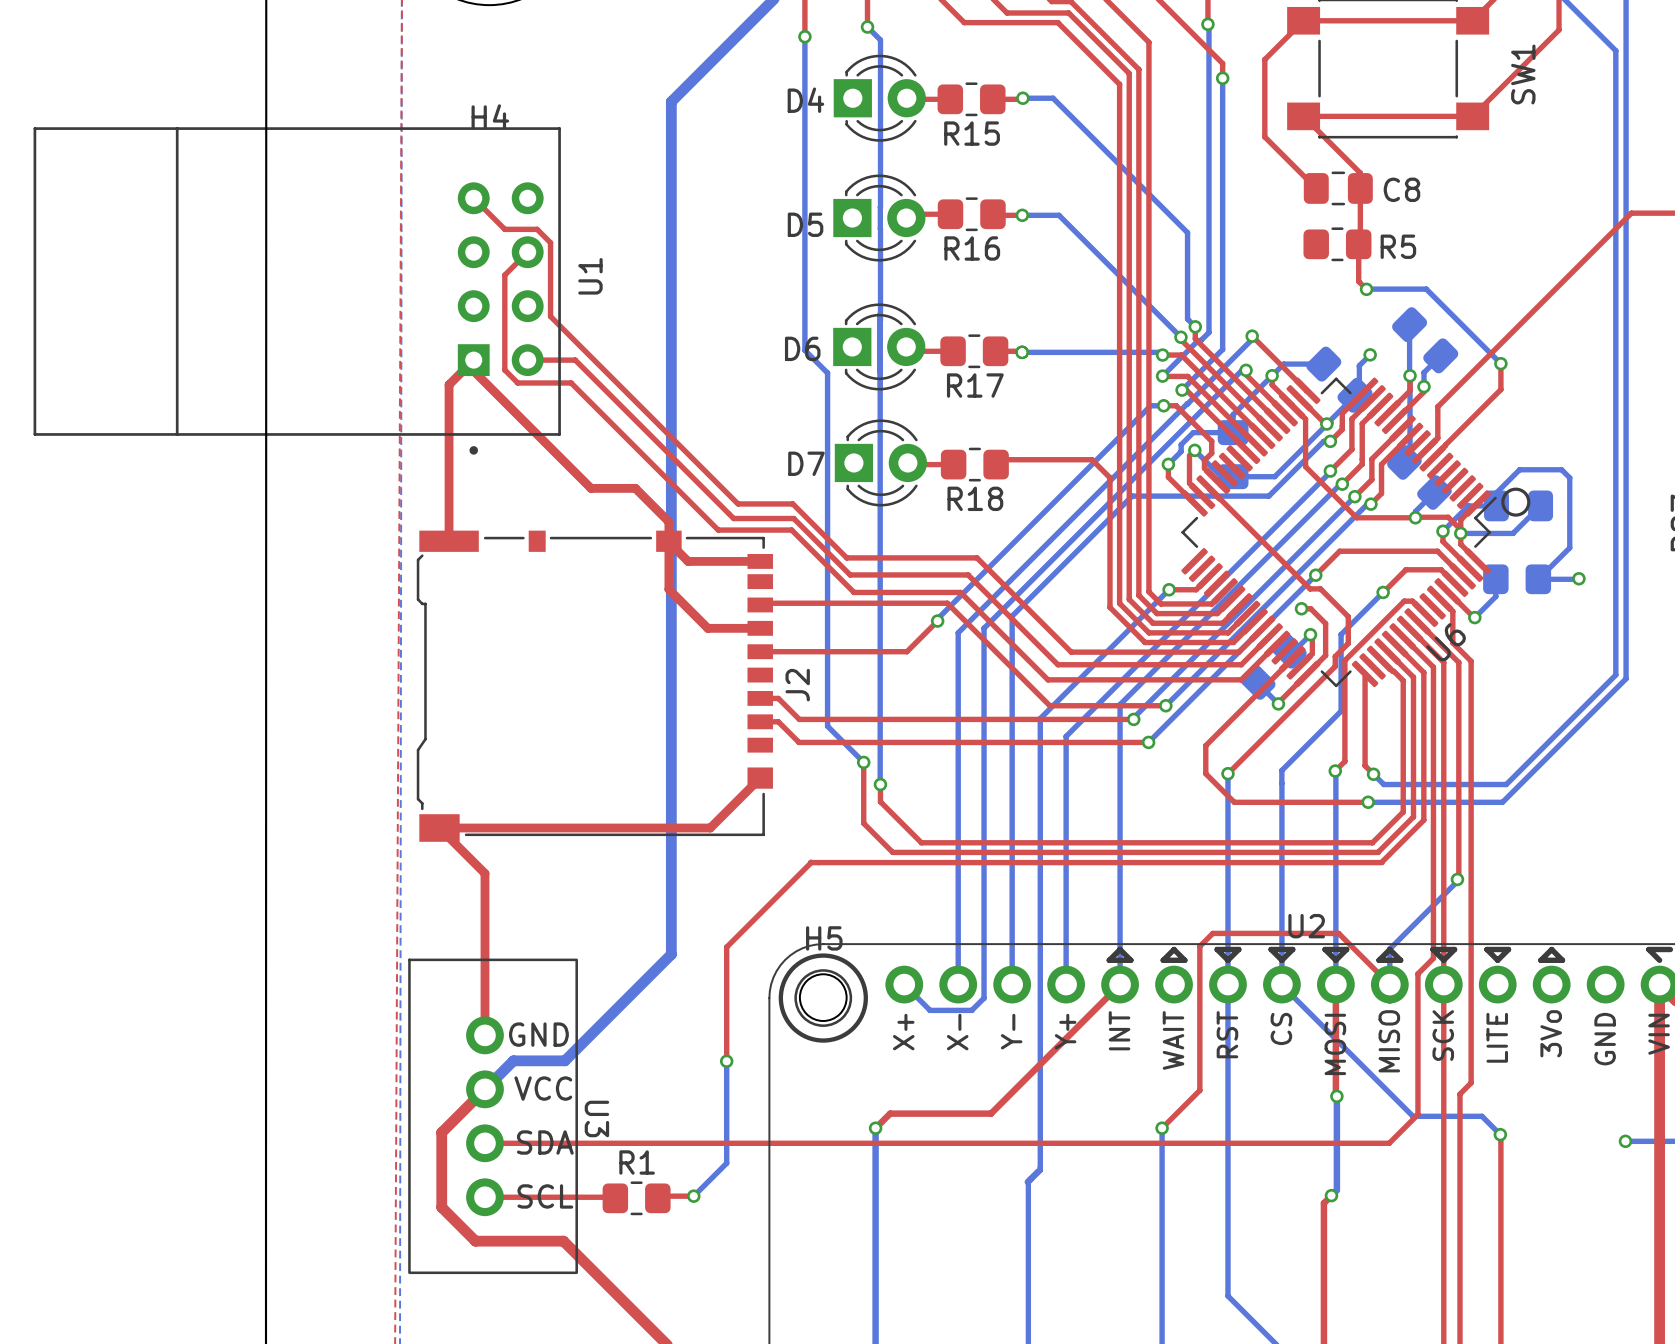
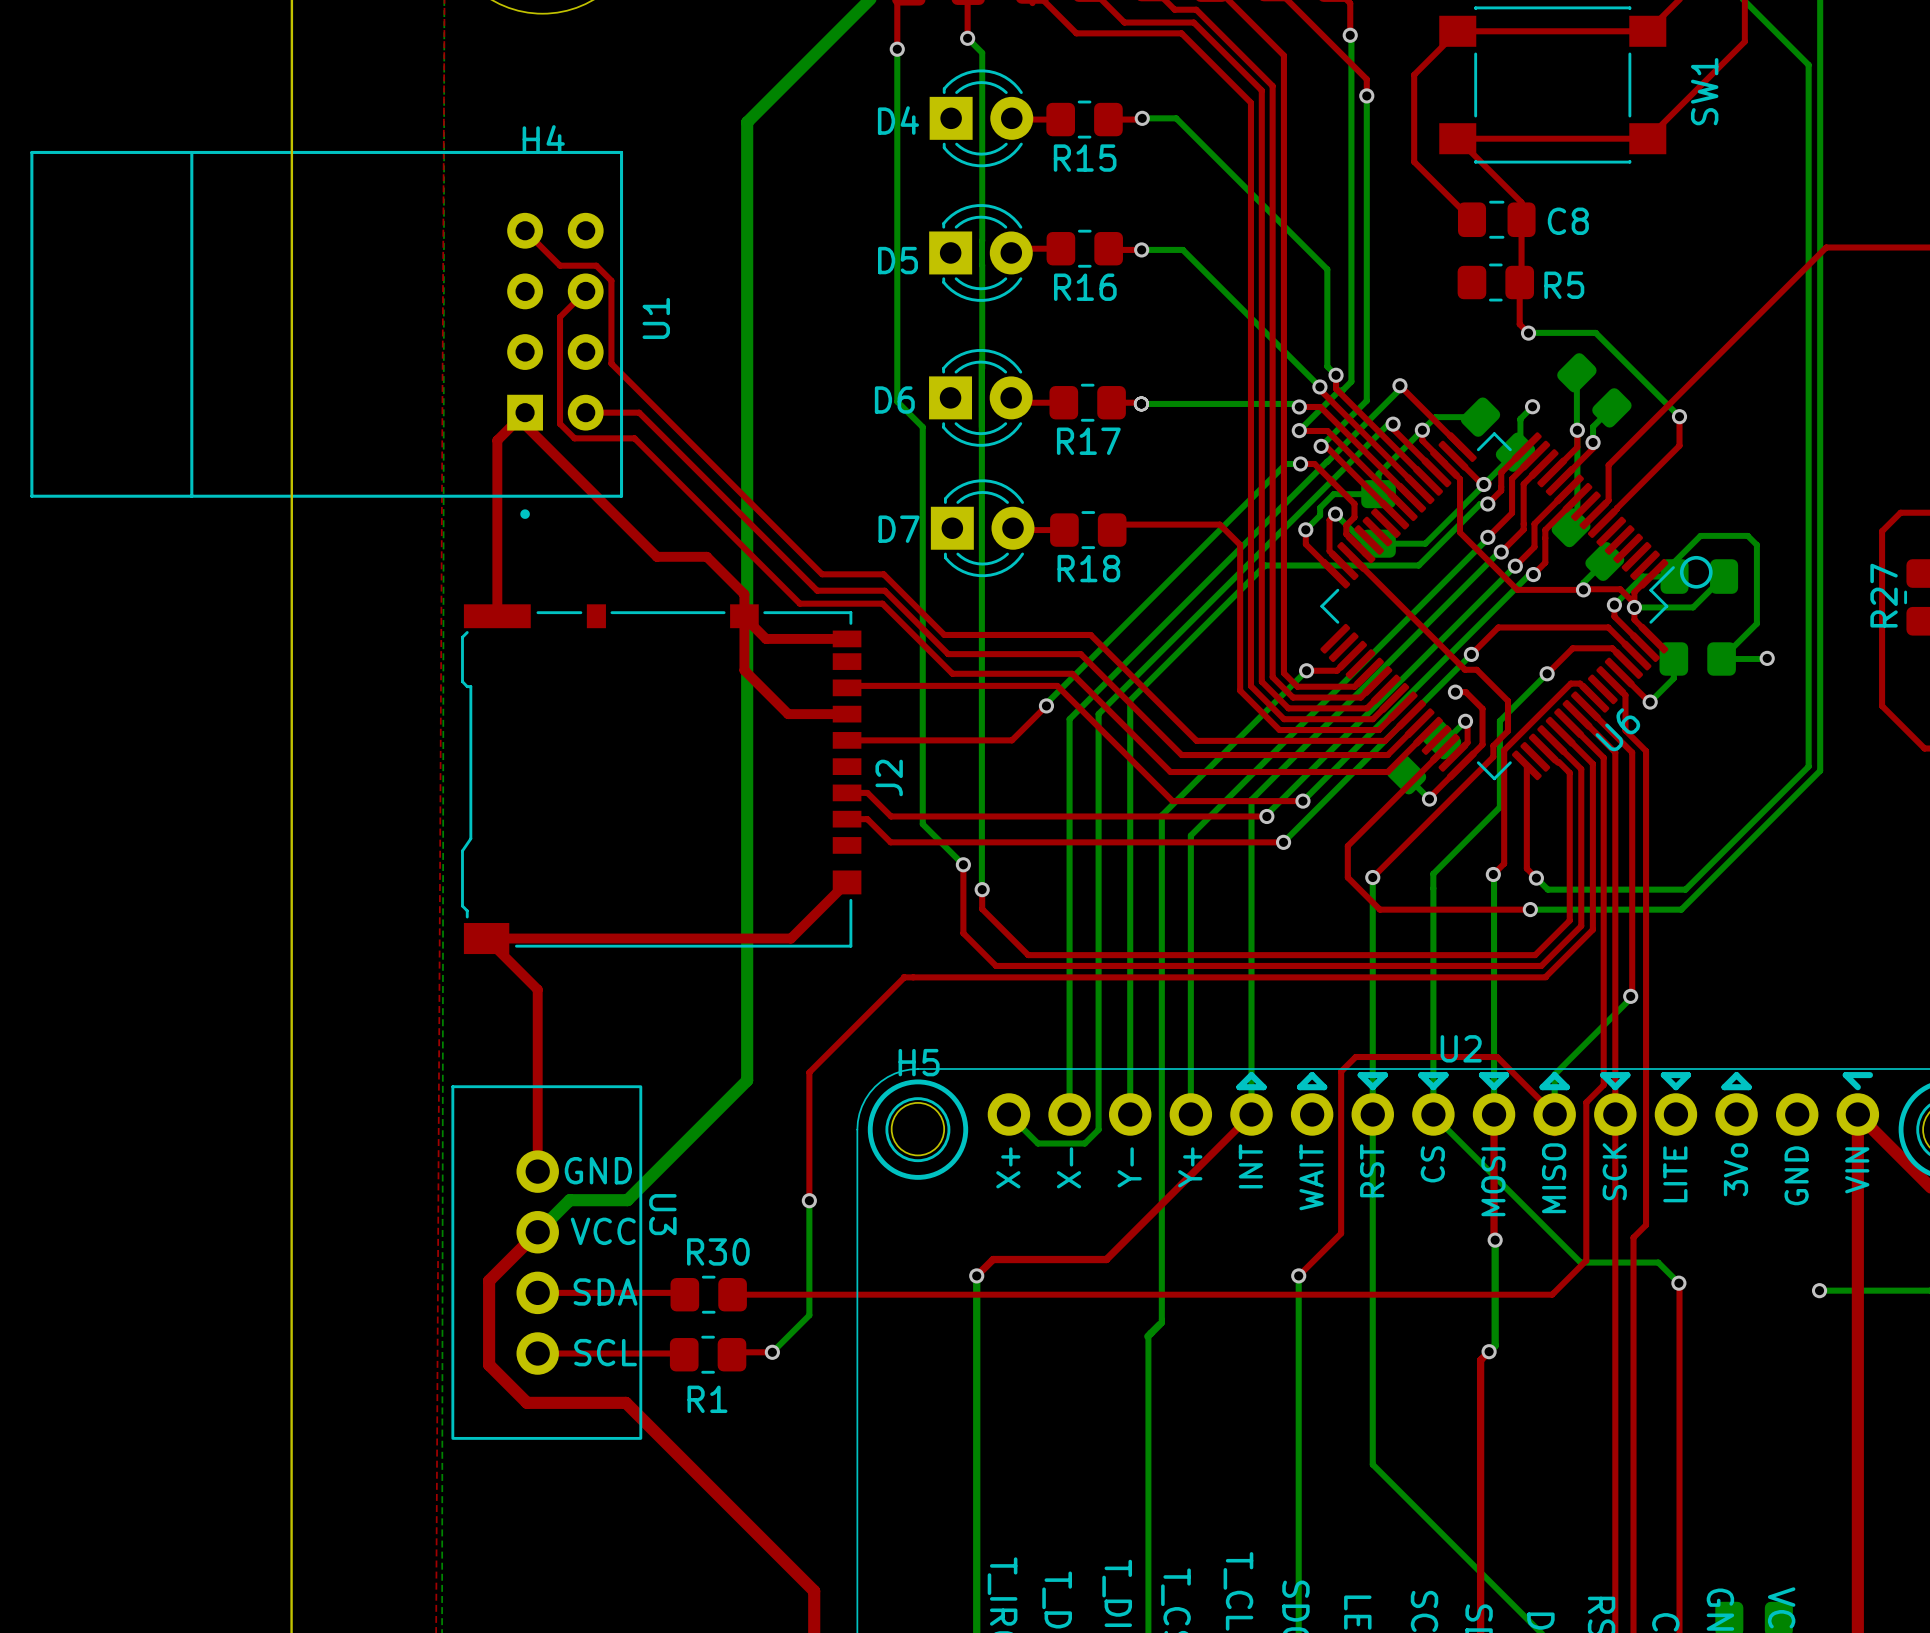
U3 name position: U3 (596, 1118) -> U3 (662, 1214)
top track: (614, 1143) (1389, 1143) -> (732, 1294) (1552, 1294) (1553, 1292)
R30: none -> (708, 1294)
R1 name position: R1 (637, 1162) -> R1 (707, 1399)

